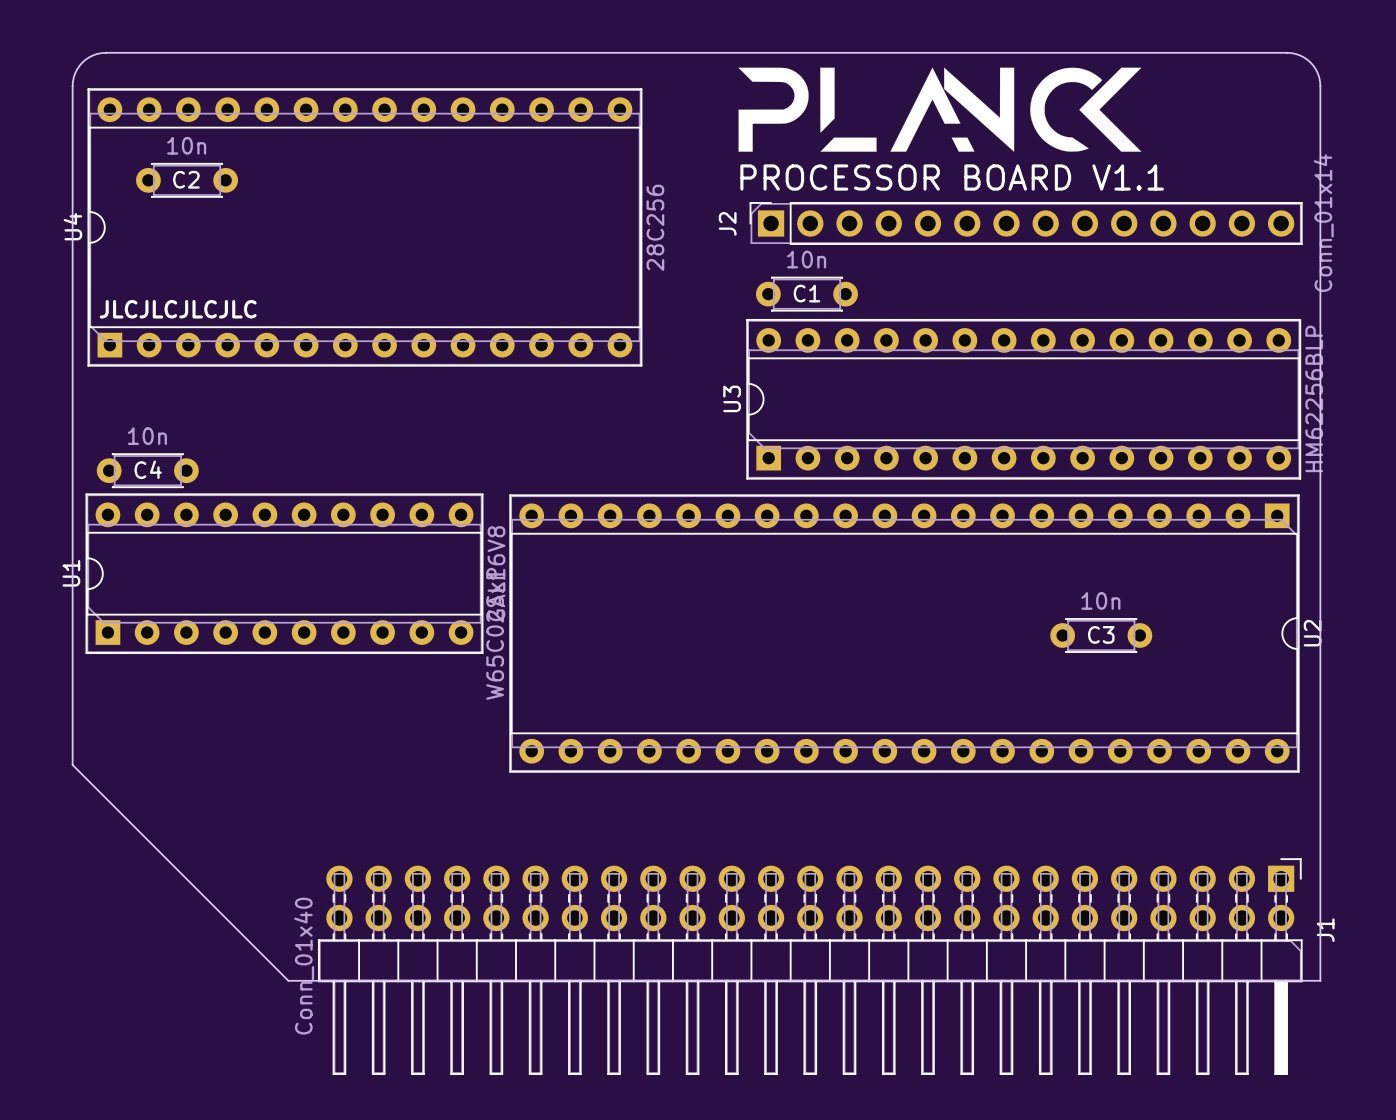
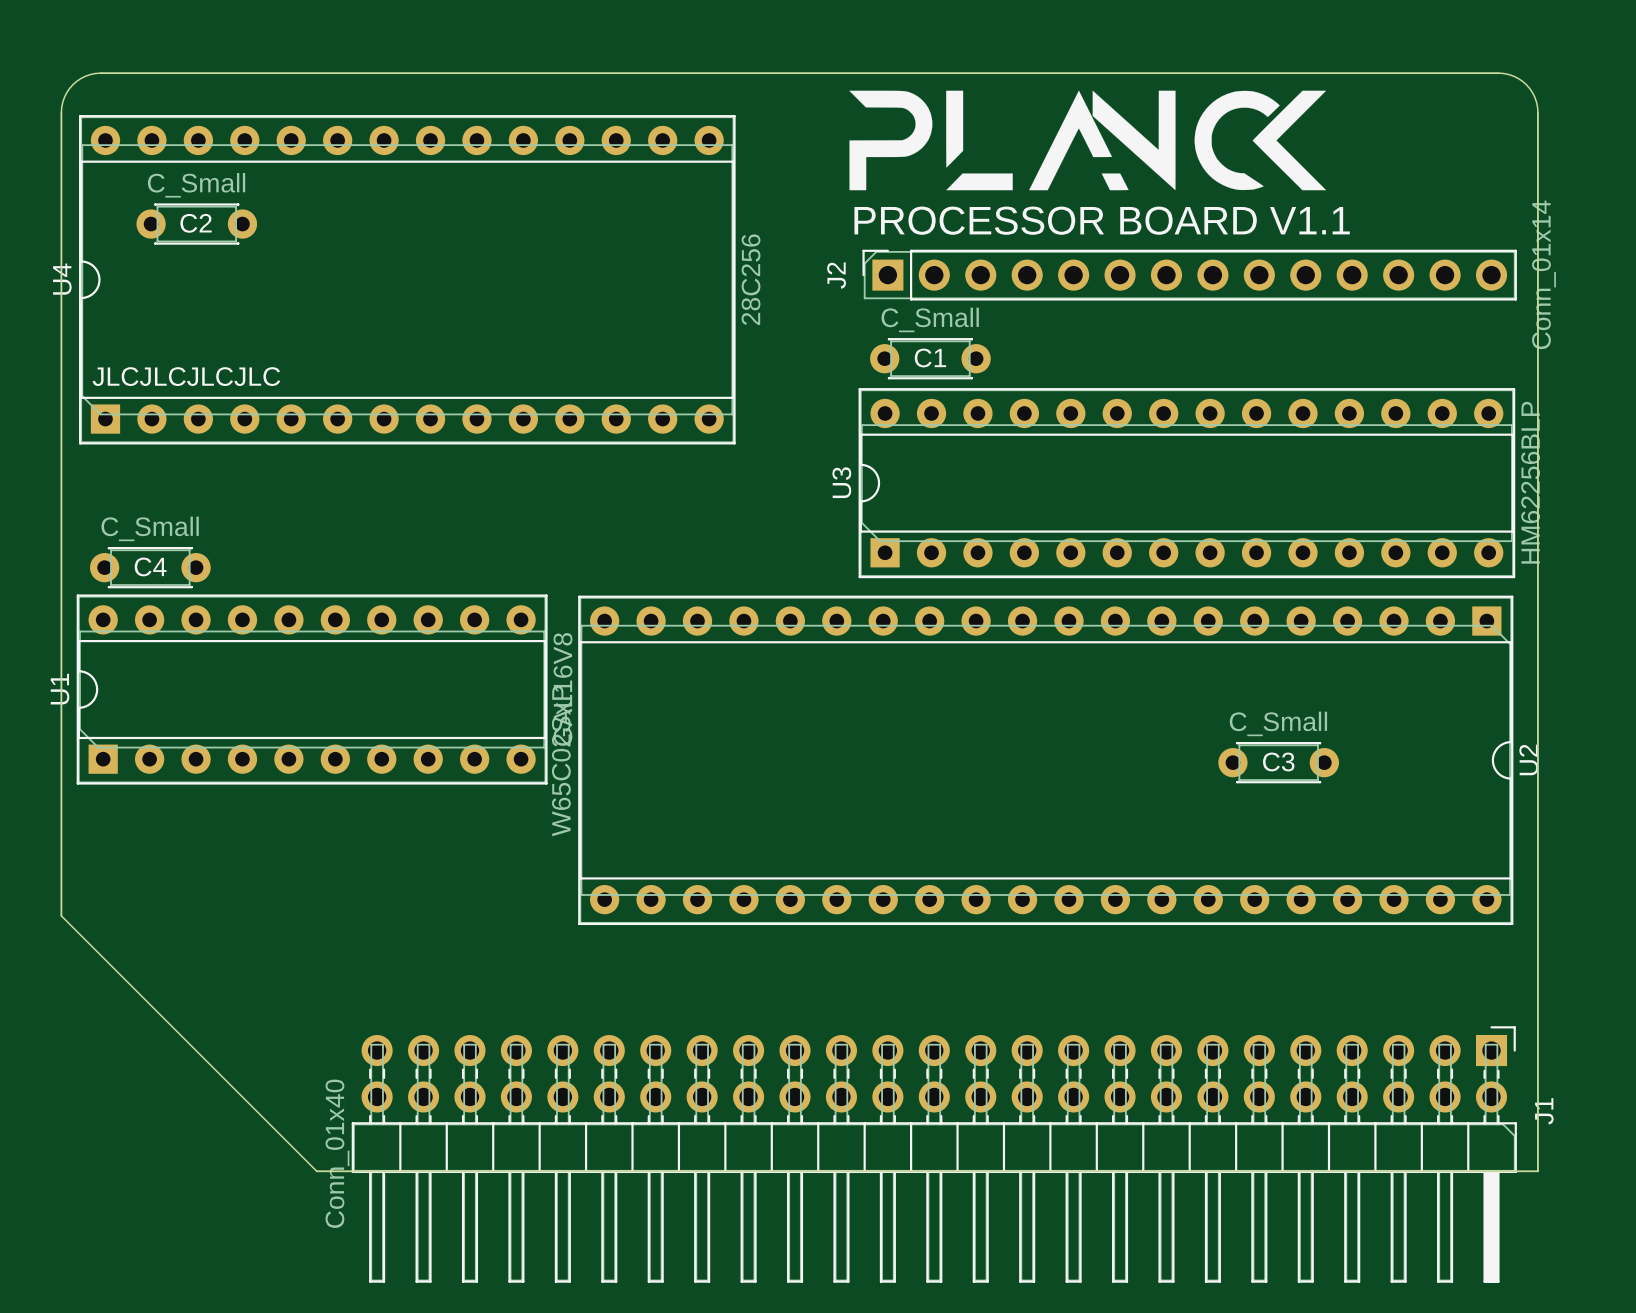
C2 value: 10n (186, 145) -> C_Small (196, 185)
C1 value: 10n (806, 259) -> C_Small (930, 319)
C4 value: 10n (147, 436) -> C_Small (150, 528)
C3 value: 10n (1100, 600) -> C_Small (1278, 723)

